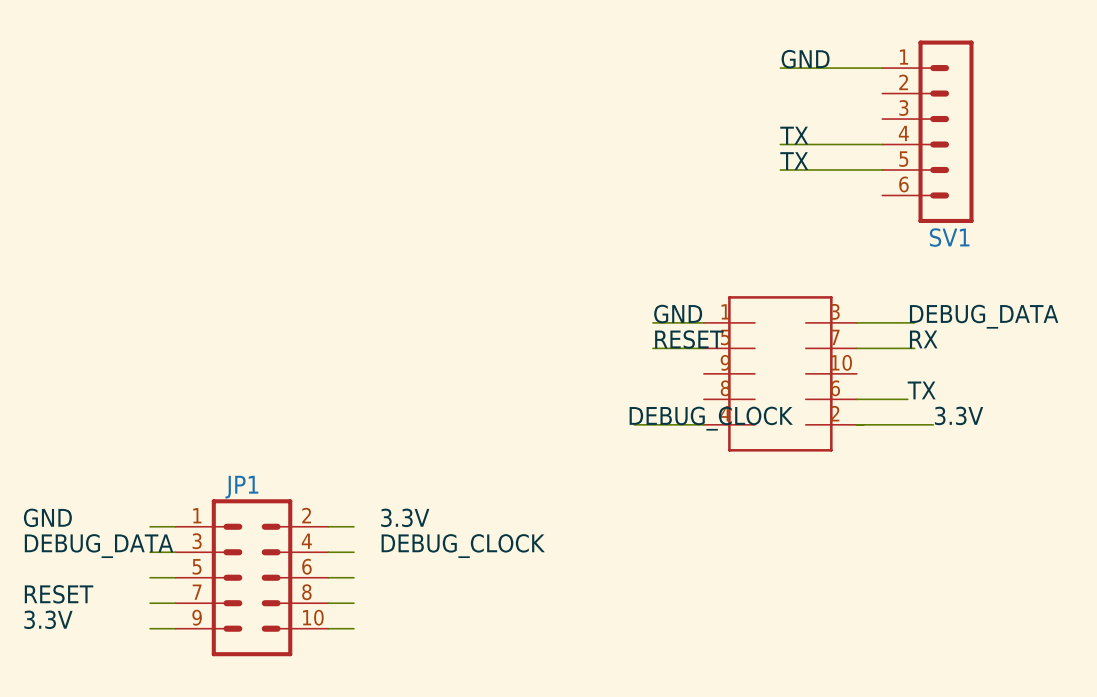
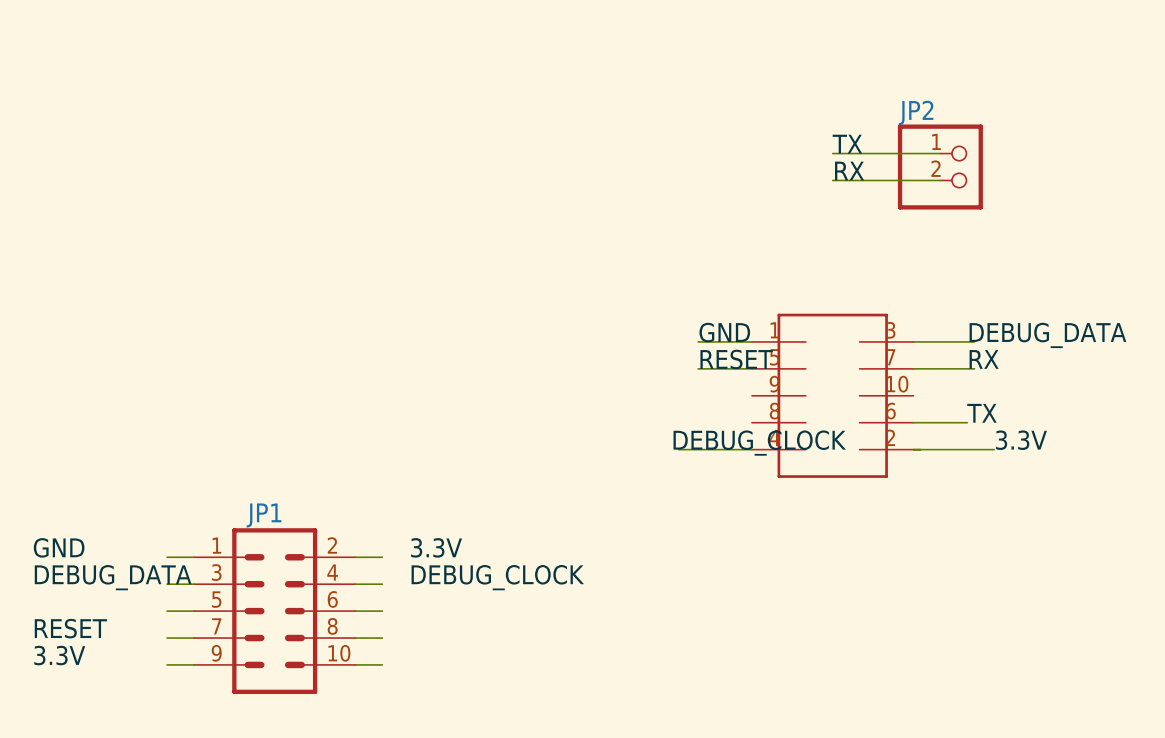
label: GND (805, 59) -> none
wire: (780, 68) (882, 68) -> none
SV1: (927, 131) -> none
JP2: none -> (940, 167)
label: TX (794, 161) -> RX (849, 171)

